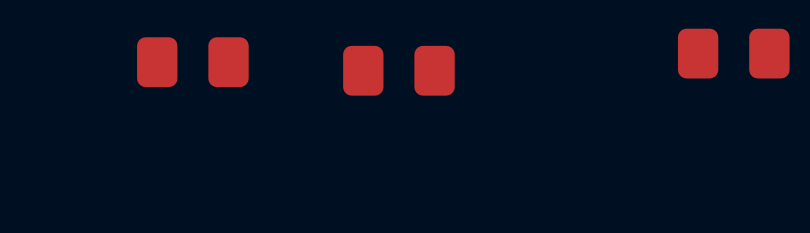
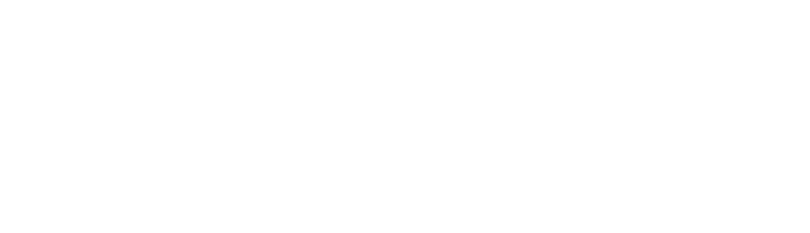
part: (733, 53) -> none
part: (192, 62) -> none
part: (398, 70) -> none

